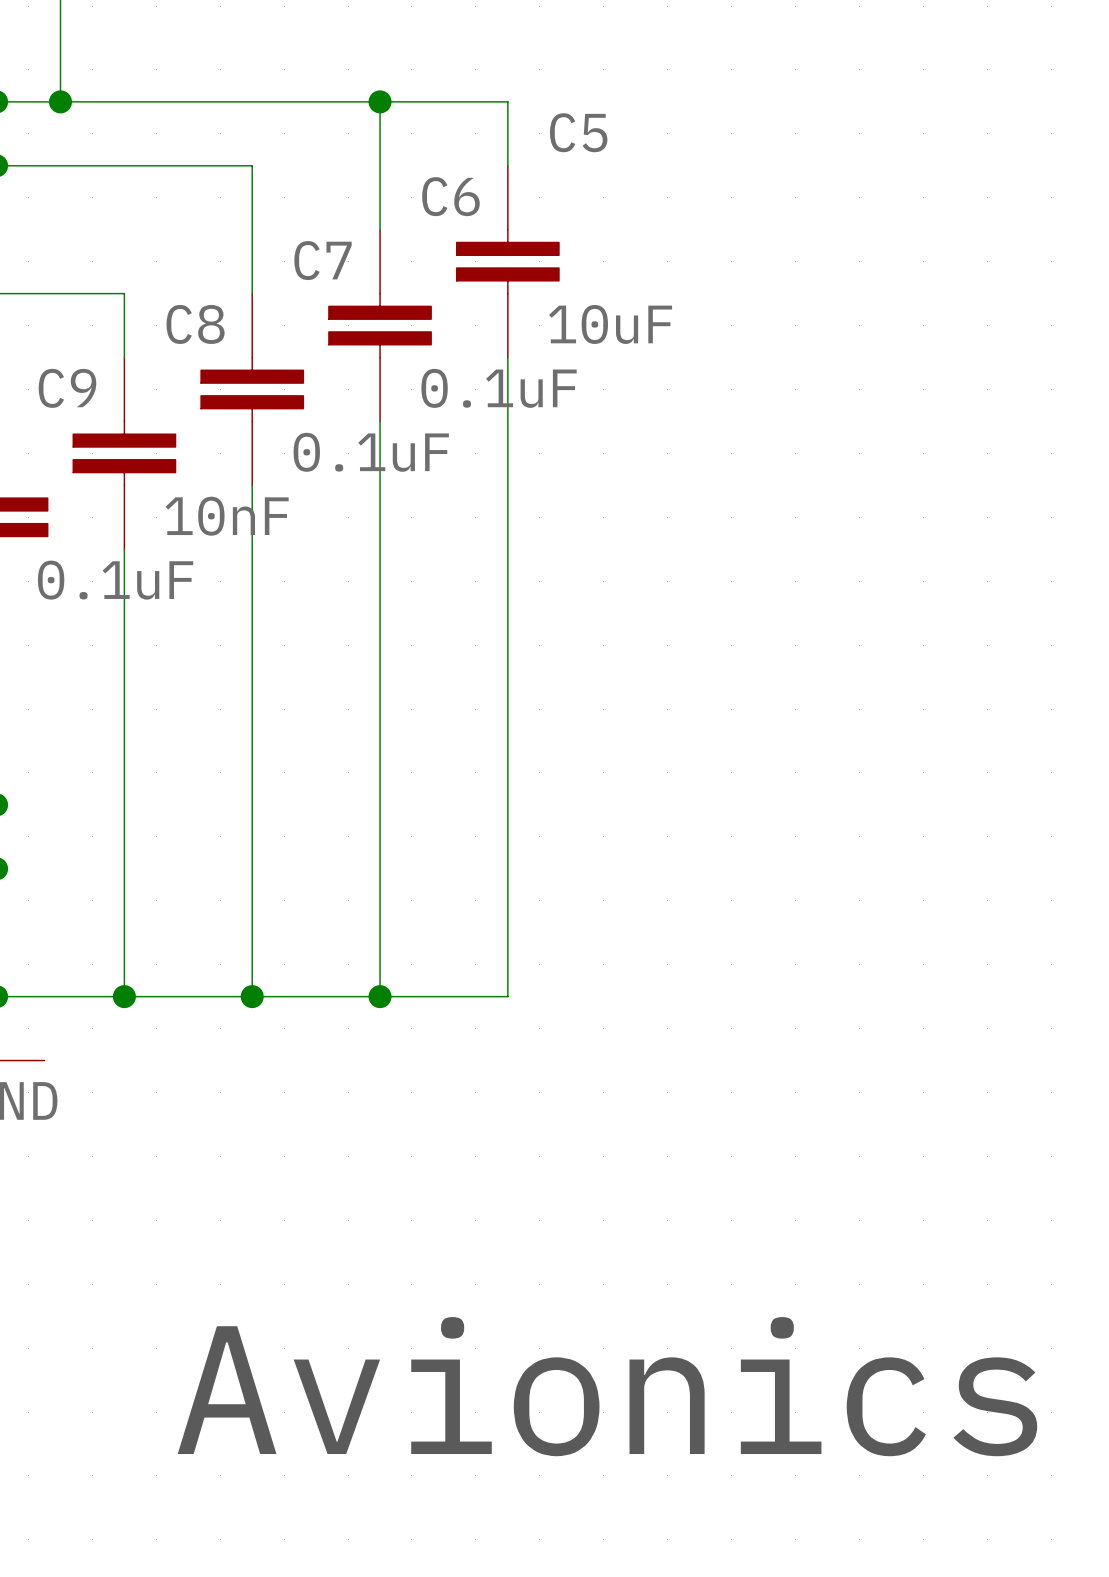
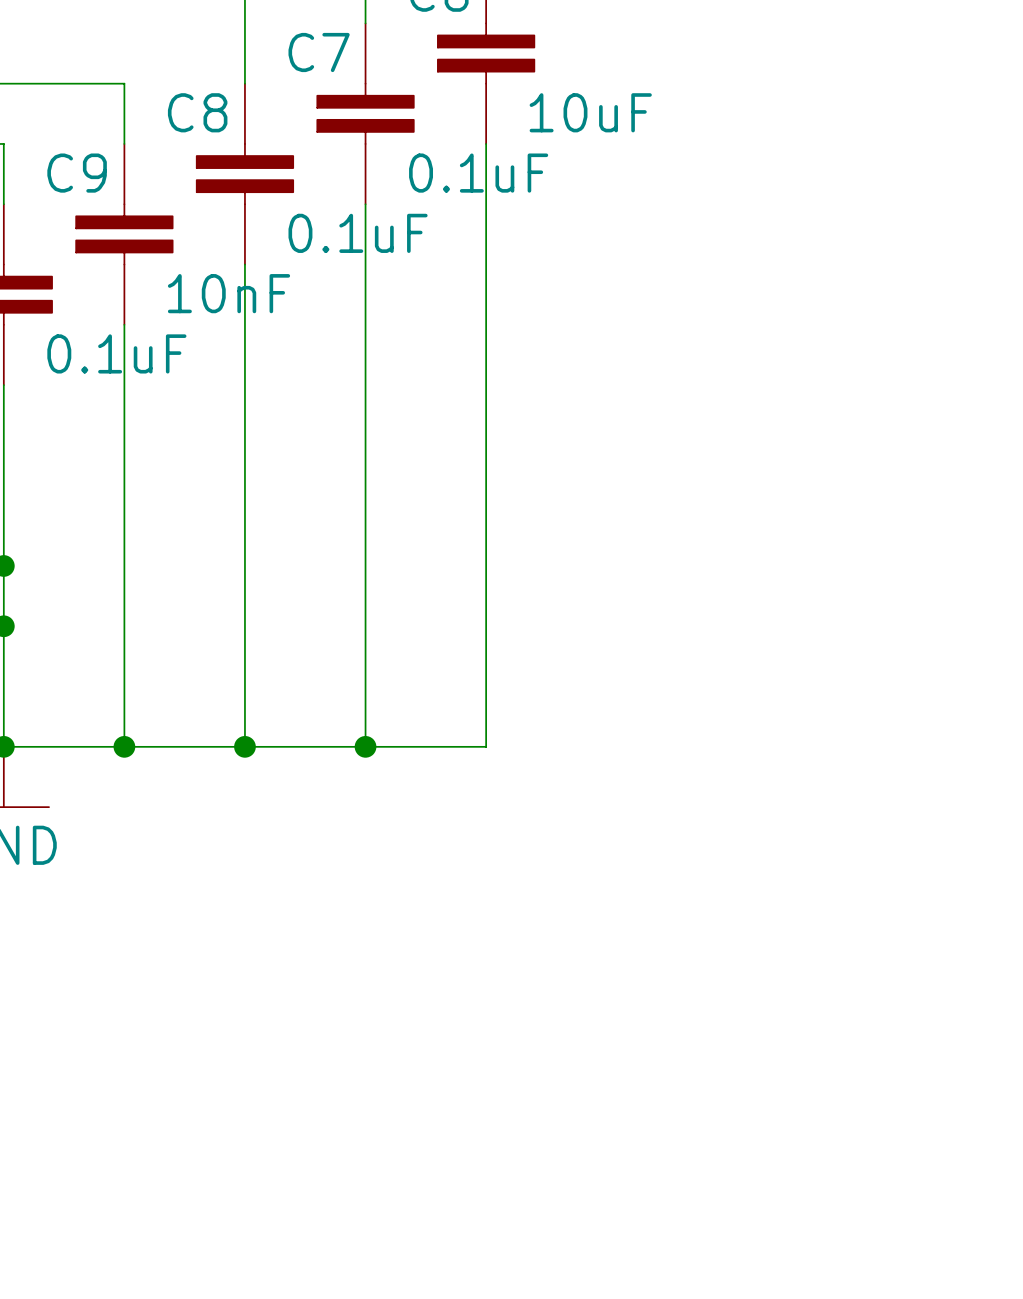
text: Avionics (607, 1386) -> none

